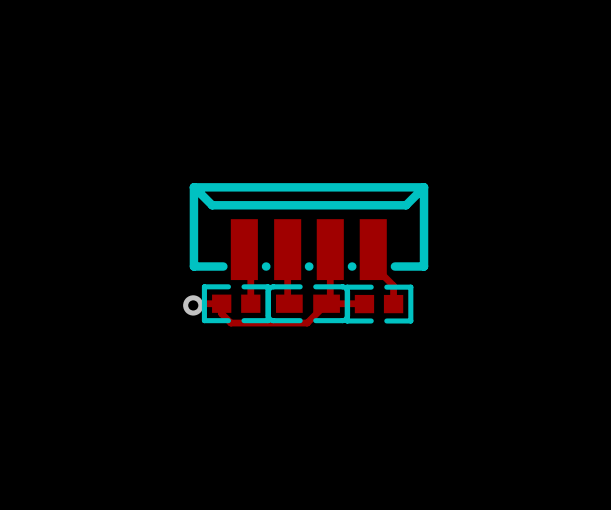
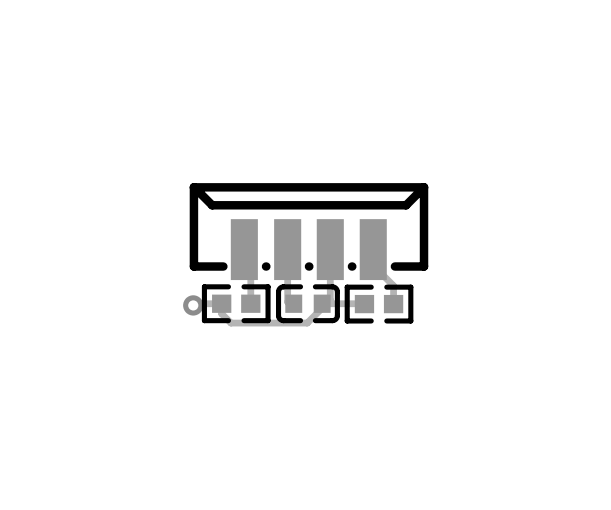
part footprint: [265, 284, 351, 324] -> [275, 284, 340, 324]

